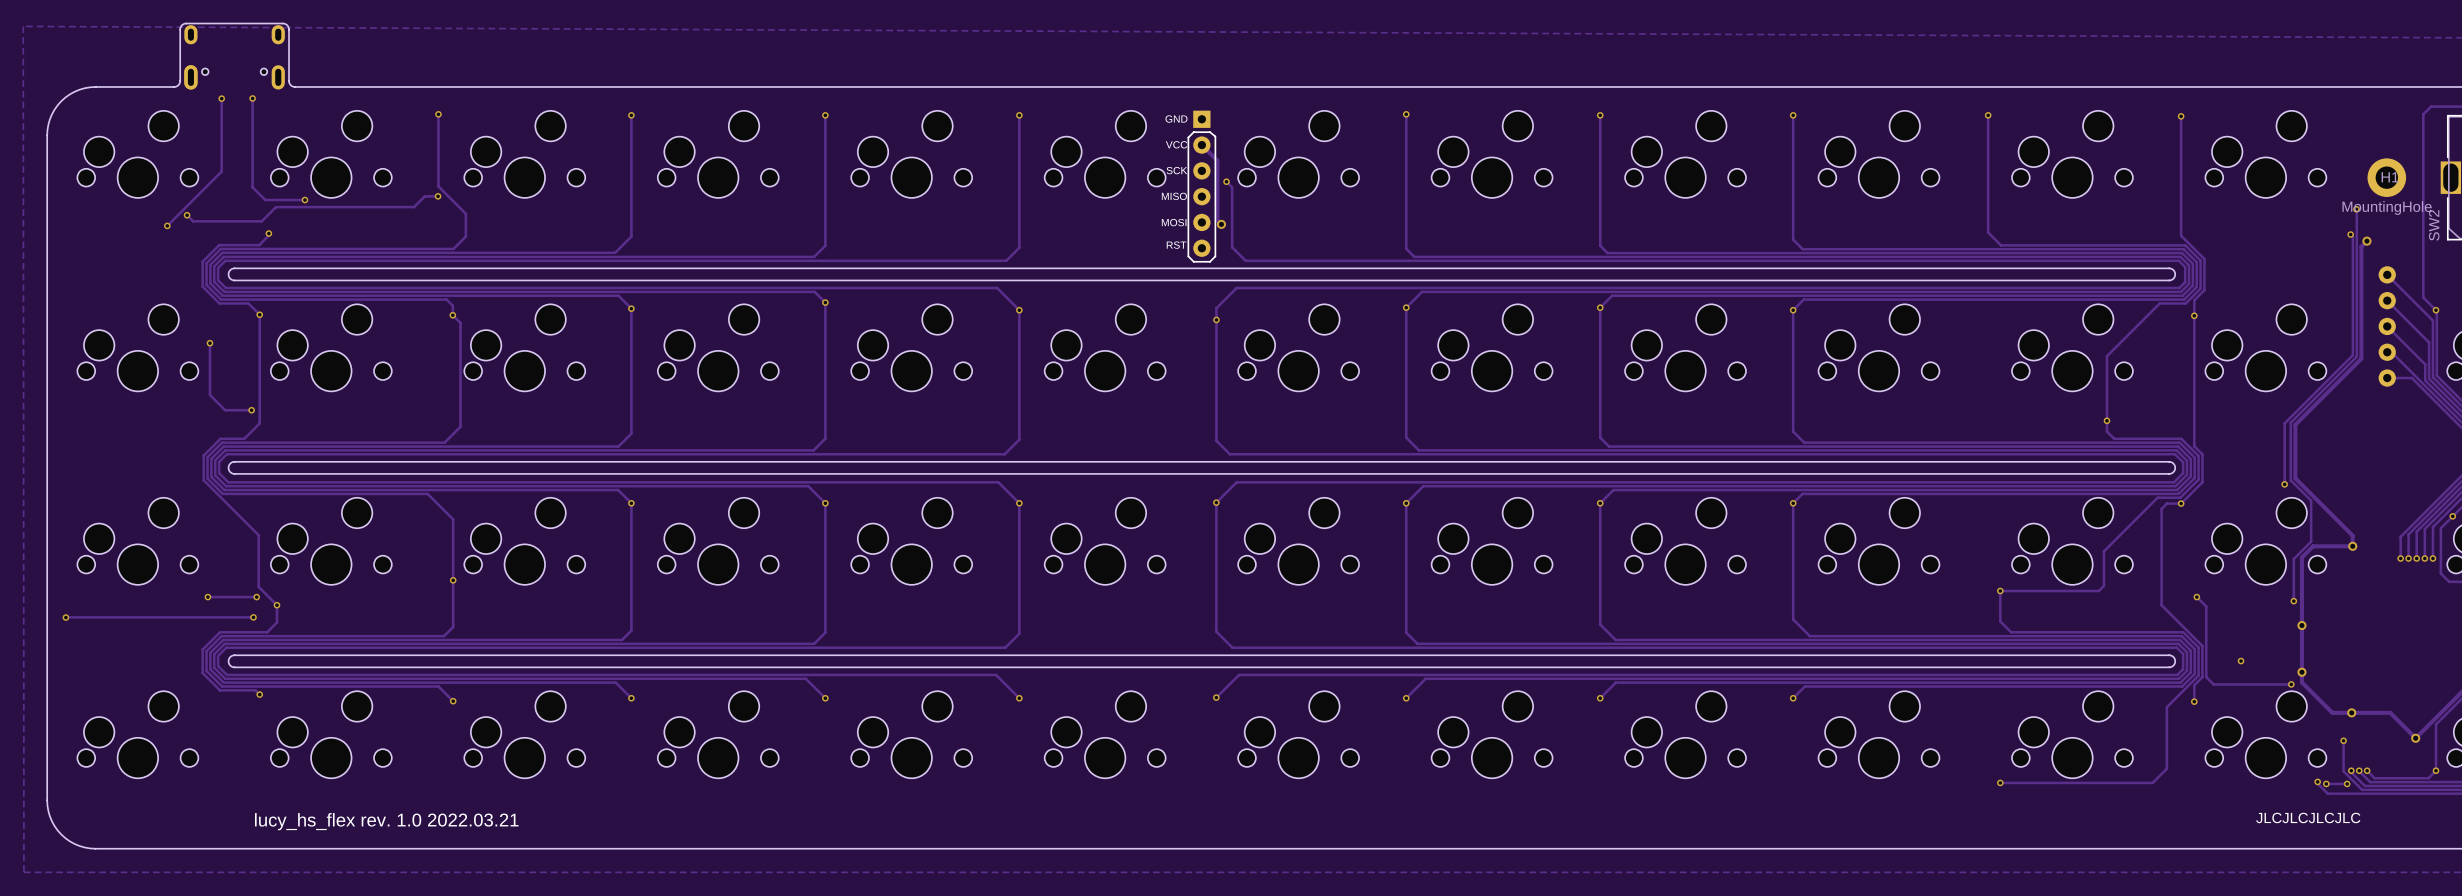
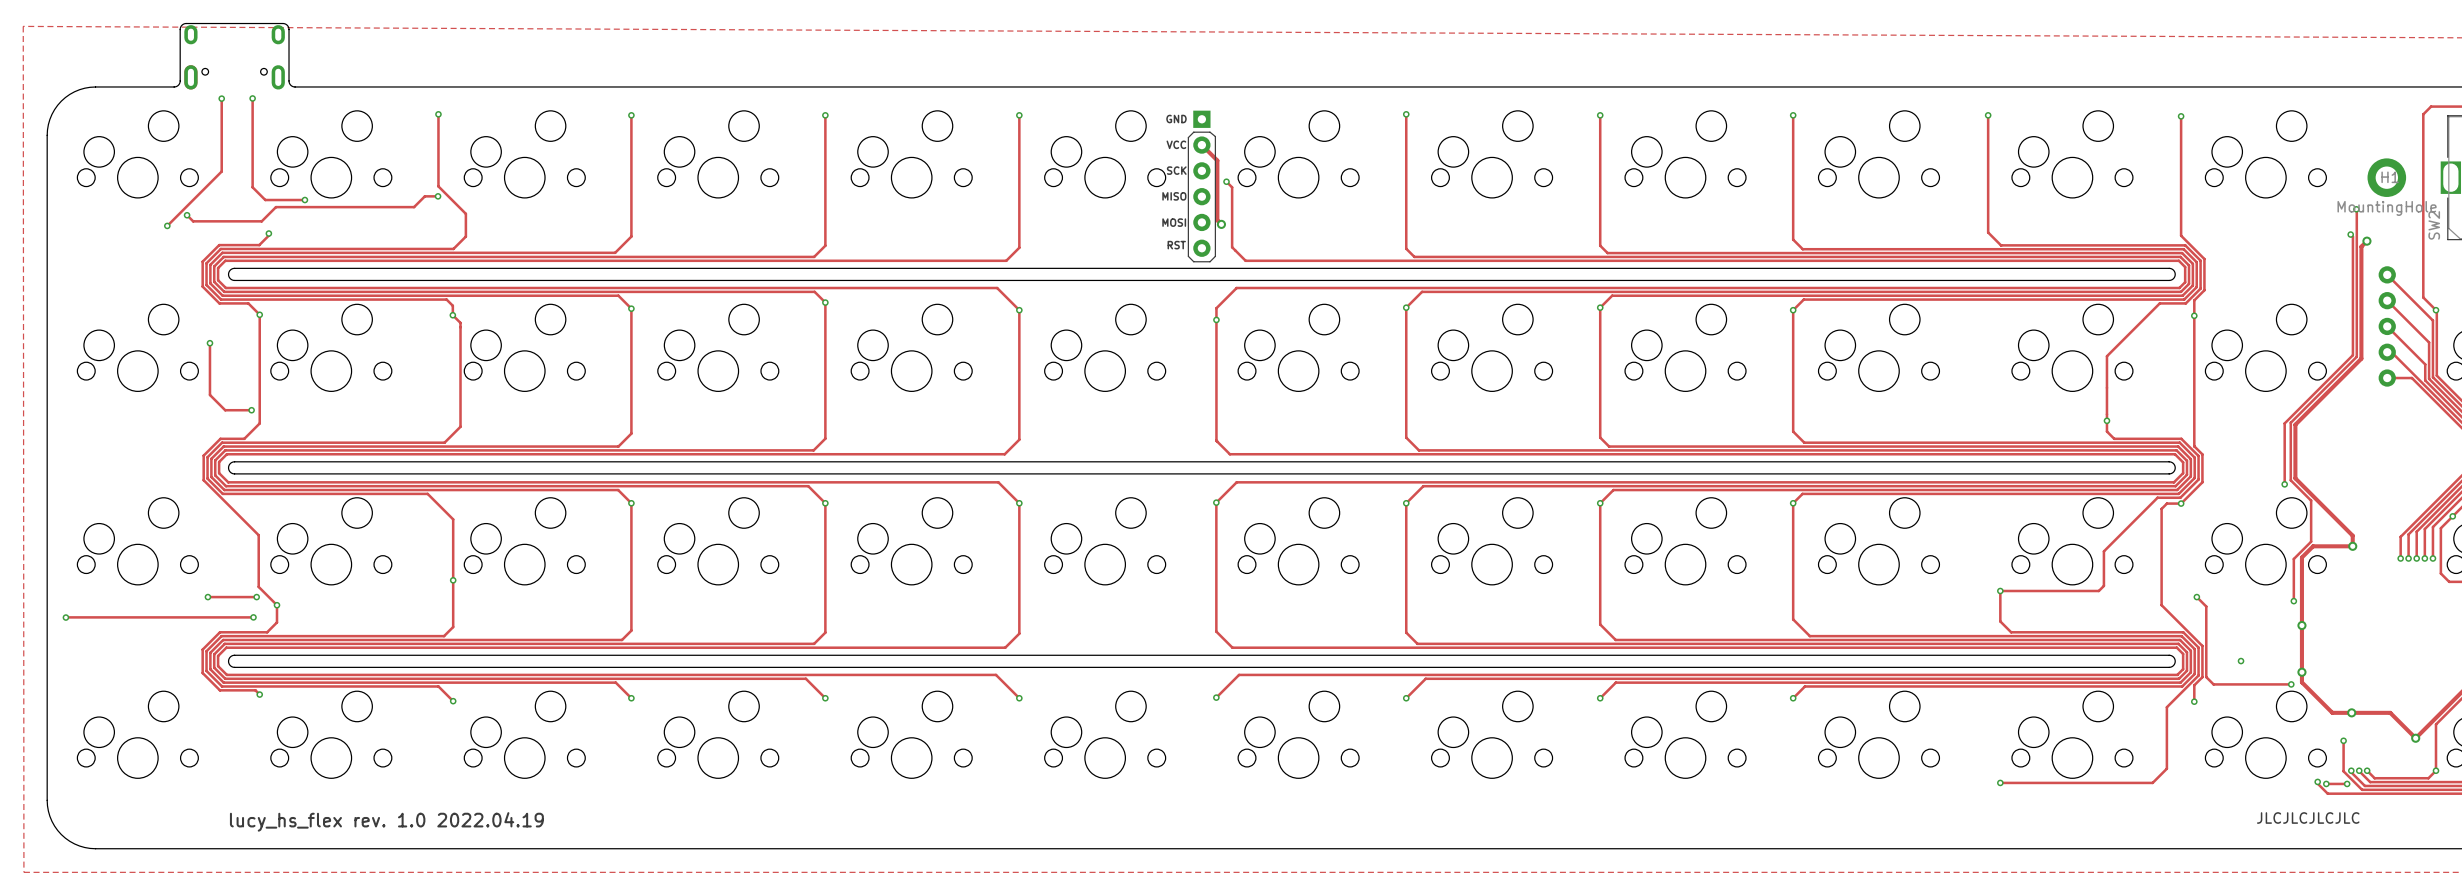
text: lucy_hs_flex rev. 1.0 2022.03.21 (386, 821) -> lucy_hs_flex rev. 1.0 2022.04.19 (386, 821)

